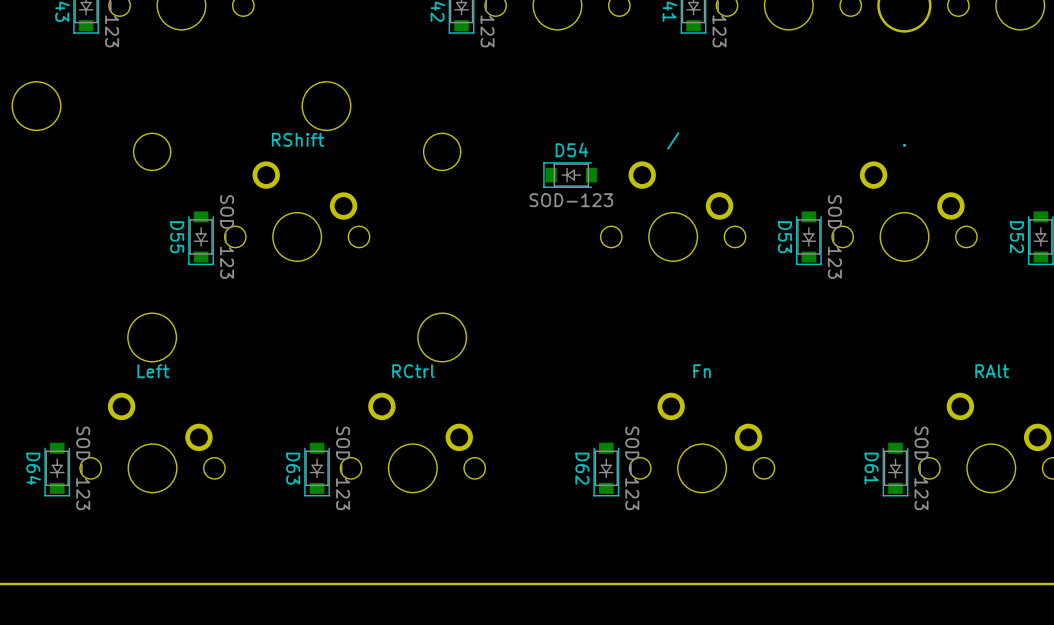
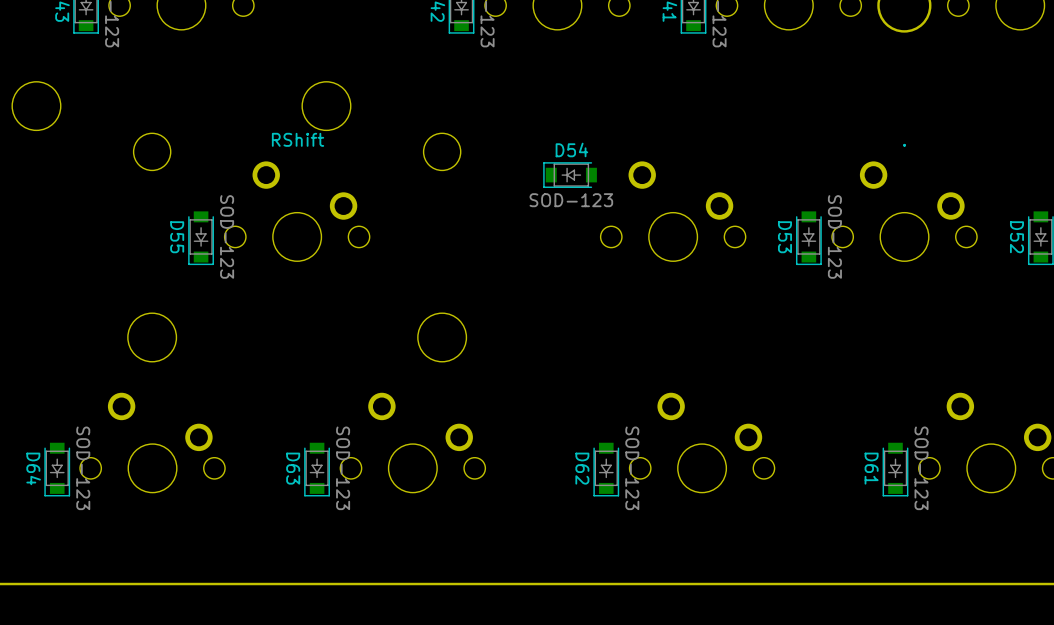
part value: / (673, 140) -> none
part value: Left (153, 371) -> none
part value: RCtrl (413, 371) -> none
part value: Fn (702, 371) -> none
part value: RAlt (992, 371) -> none

